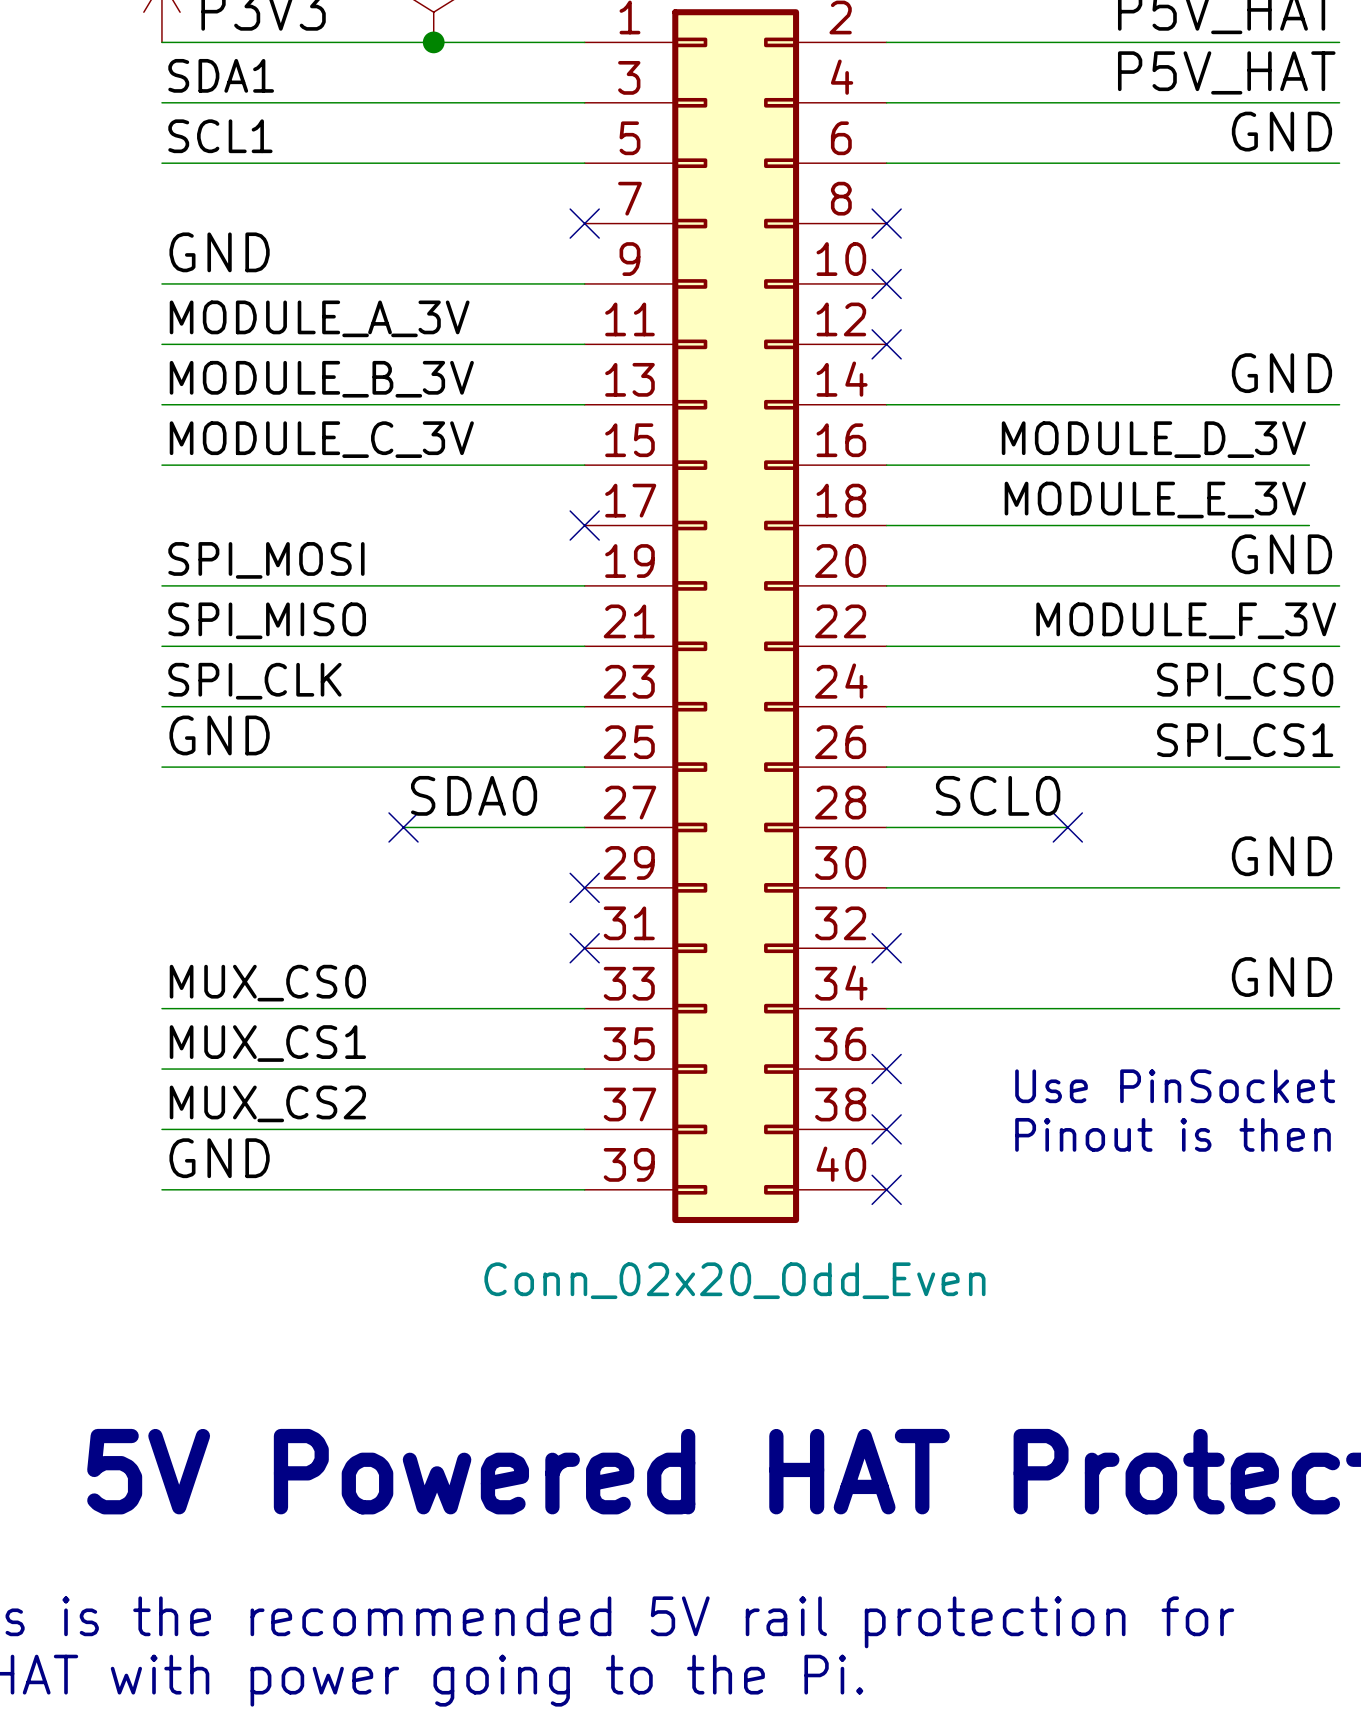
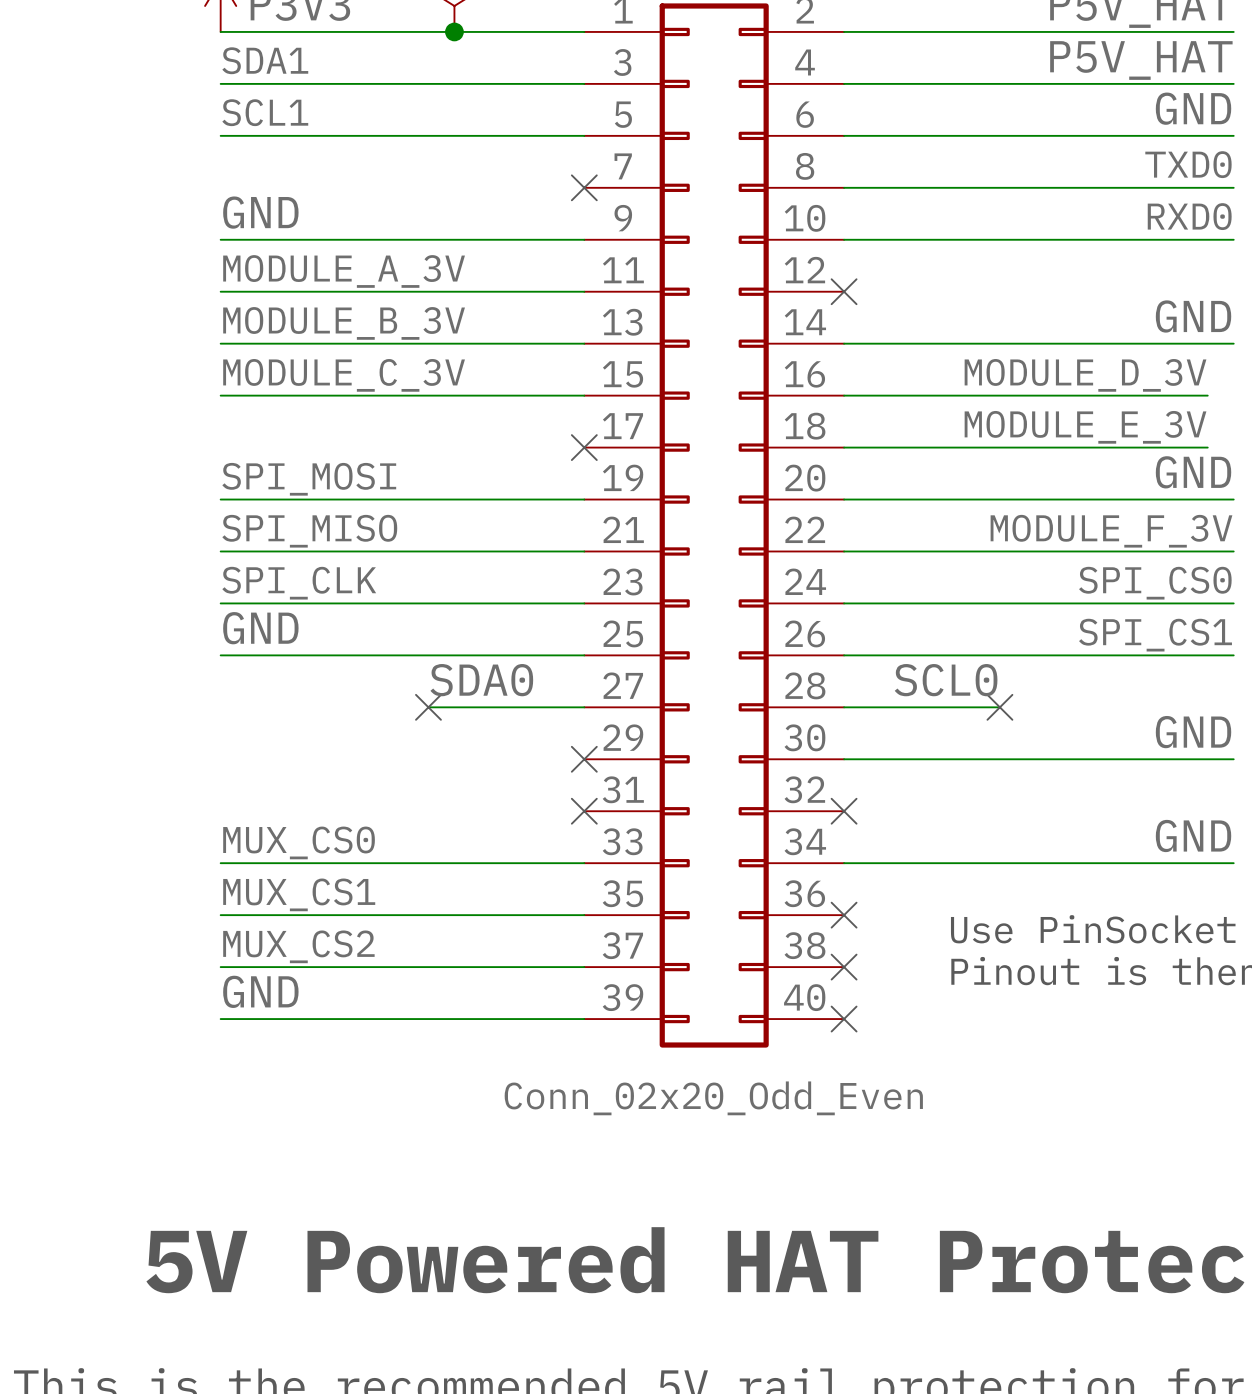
label: none -> TXD0 (1188, 164)
wire: none -> (844, 187) (1233, 187)
no-connect mark: (886, 223) -> none
label: none -> RXD0 (1189, 216)
wire: none -> (844, 239) (1233, 239)
no-connect mark: (886, 283) -> none

